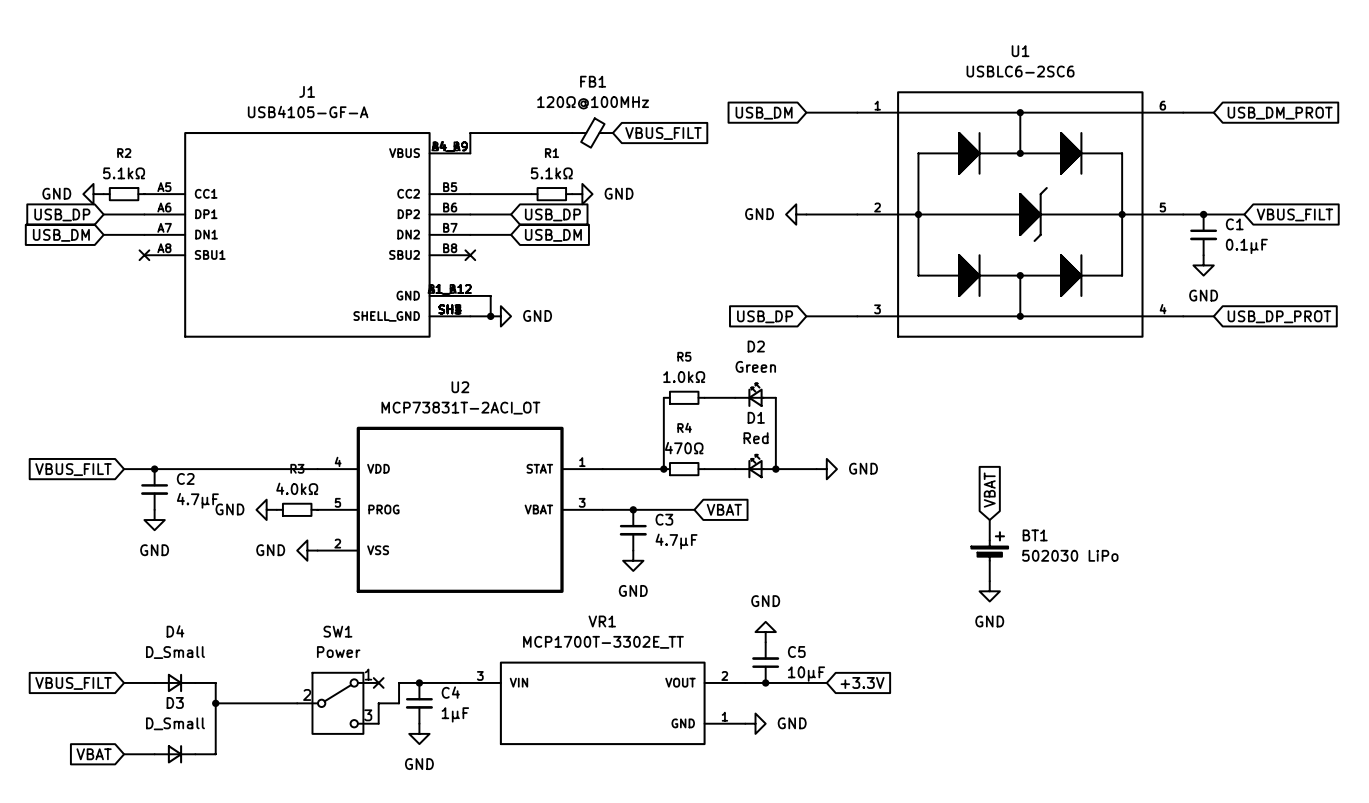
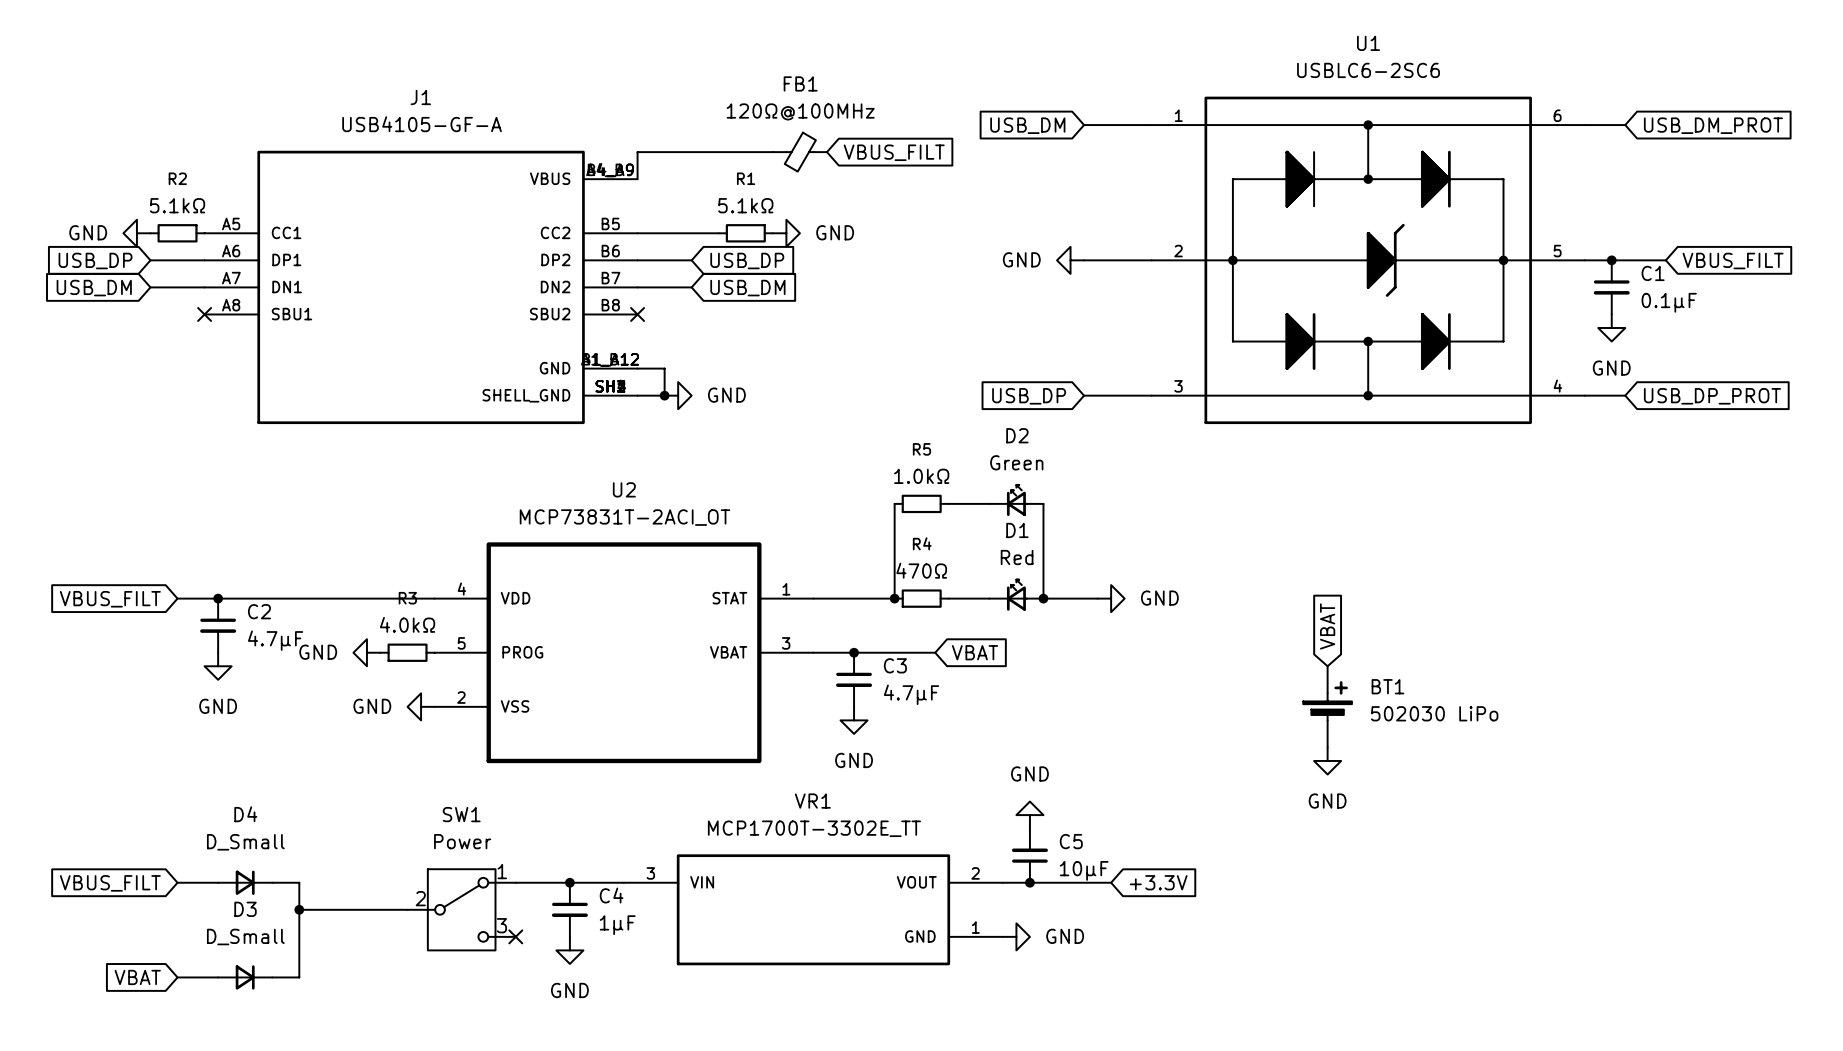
no-connect mark position: (378, 682) -> (515, 936)
wire: (399, 682) (399, 703) (378, 703) (378, 723) -> (542, 882) (515, 882)

